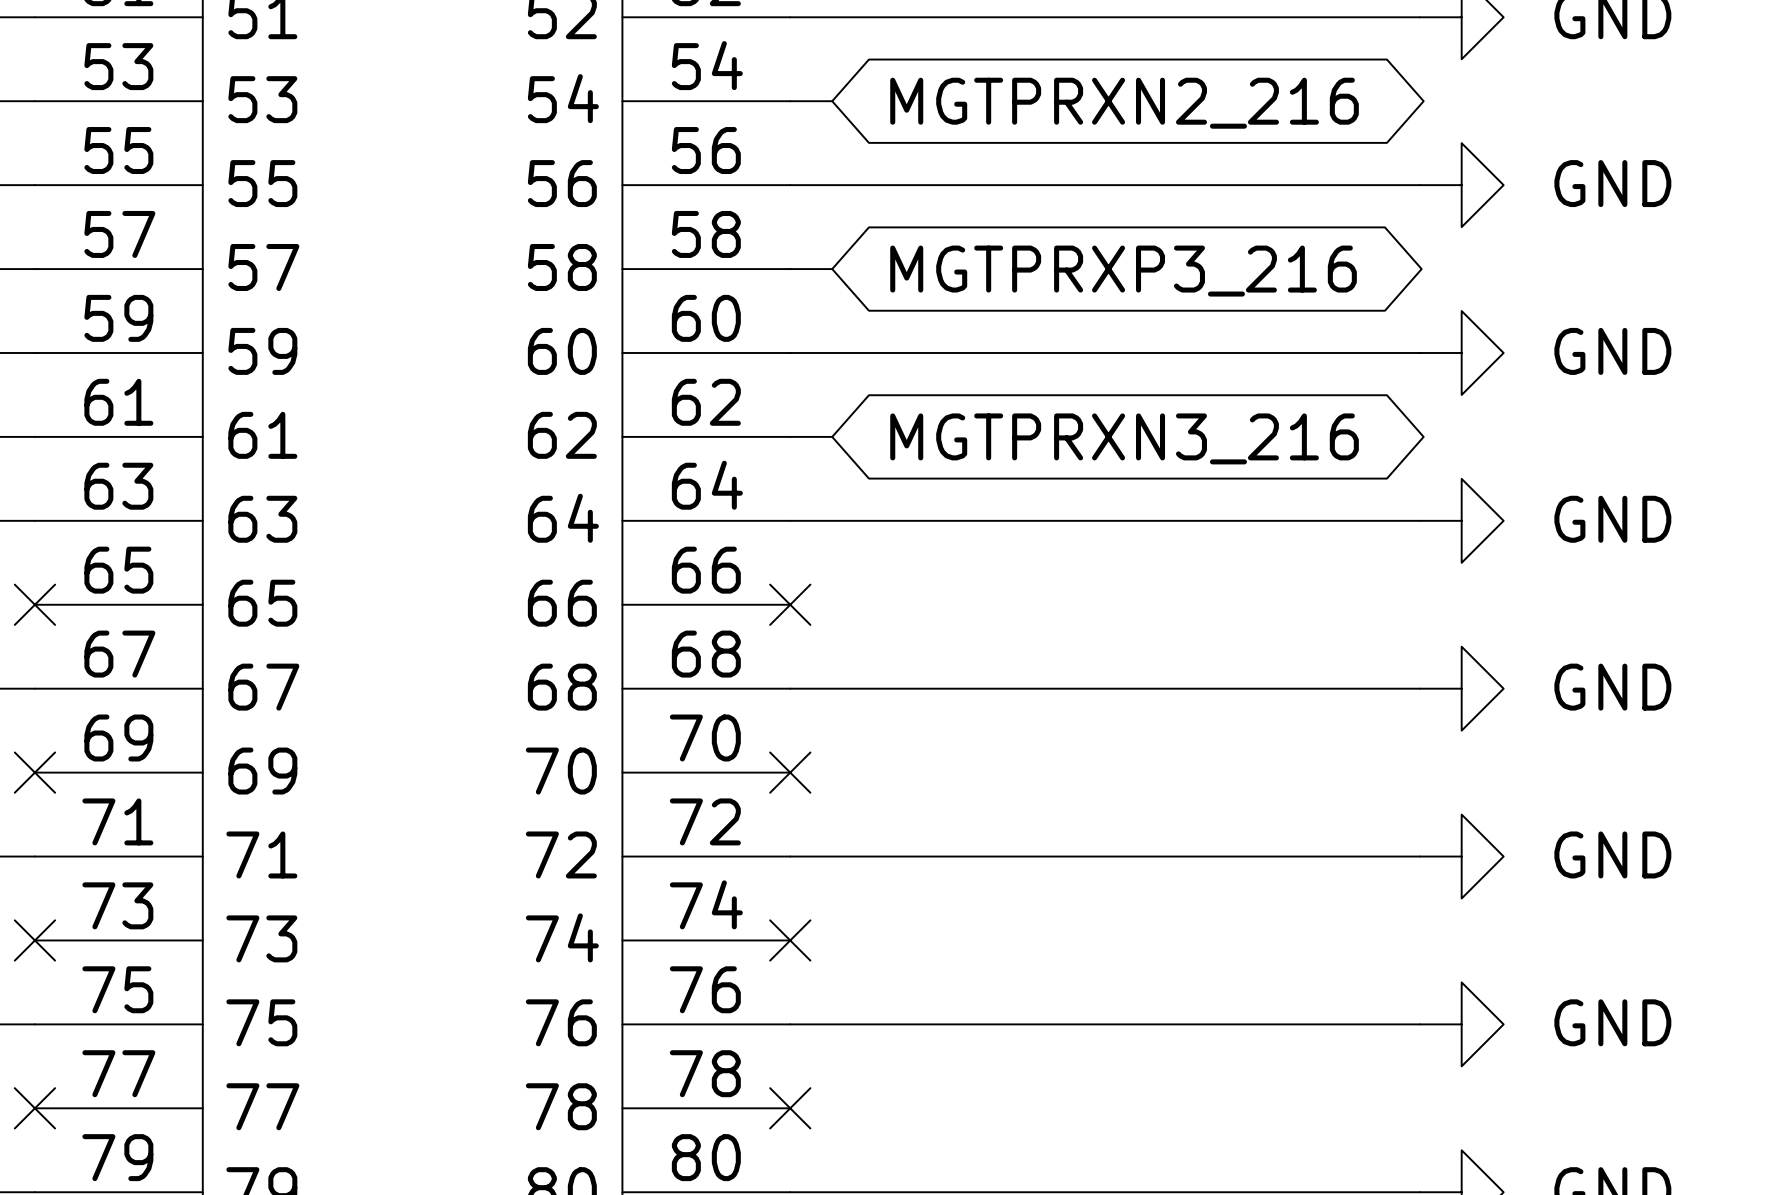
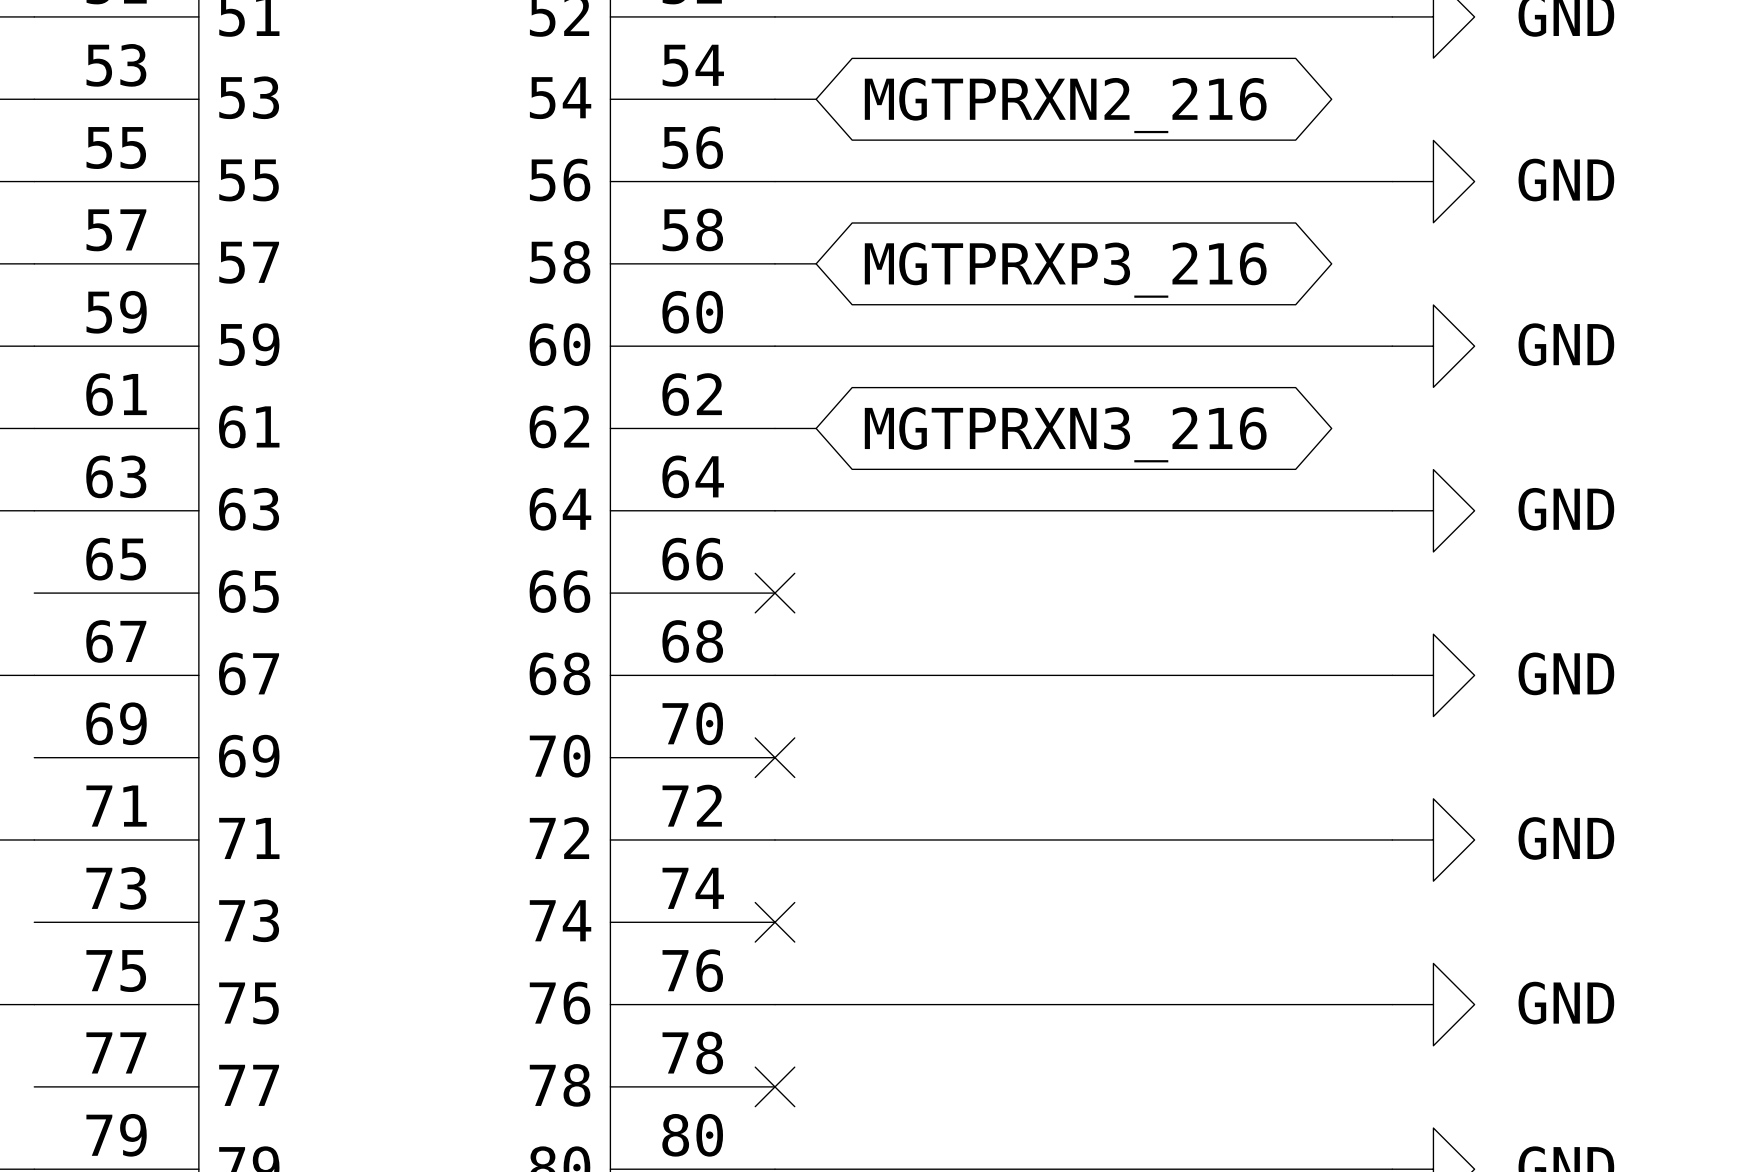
no-connect mark: (34, 604) -> none
no-connect mark: (34, 772) -> none
no-connect mark: (34, 940) -> none
no-connect mark: (34, 1108) -> none

